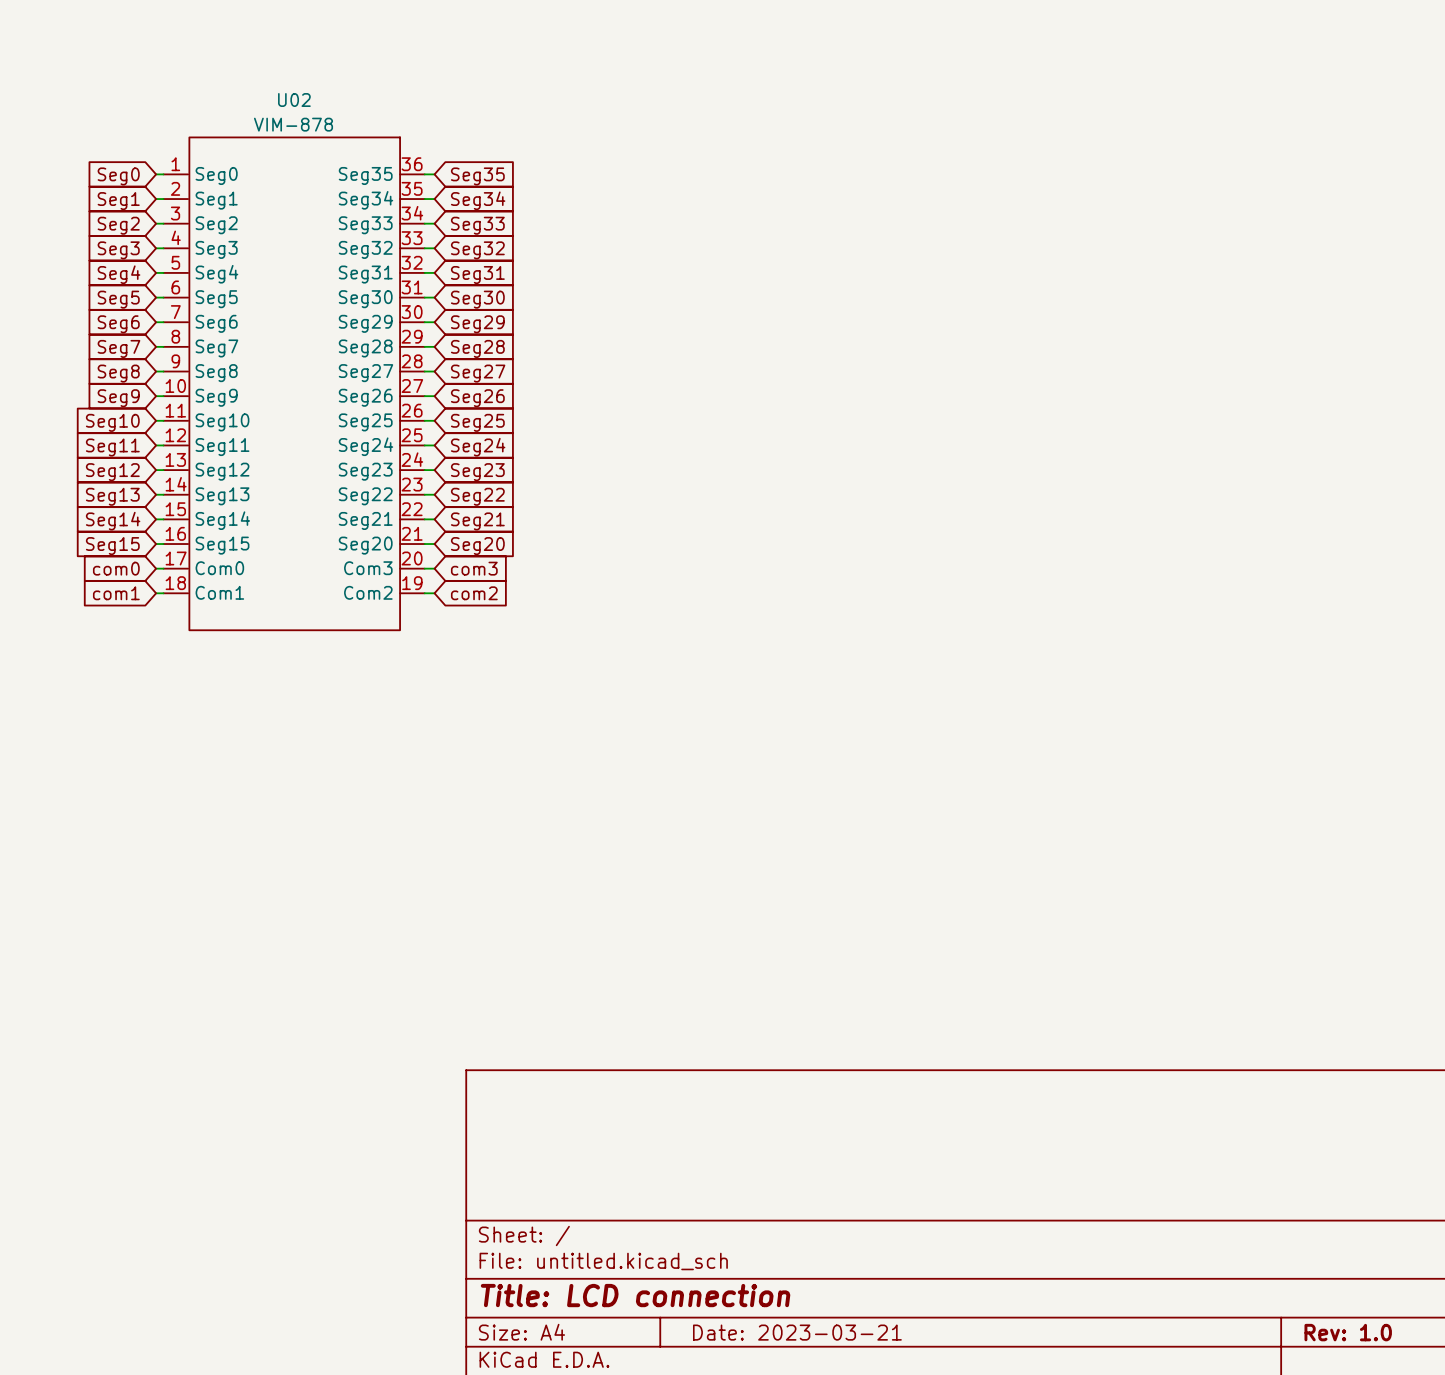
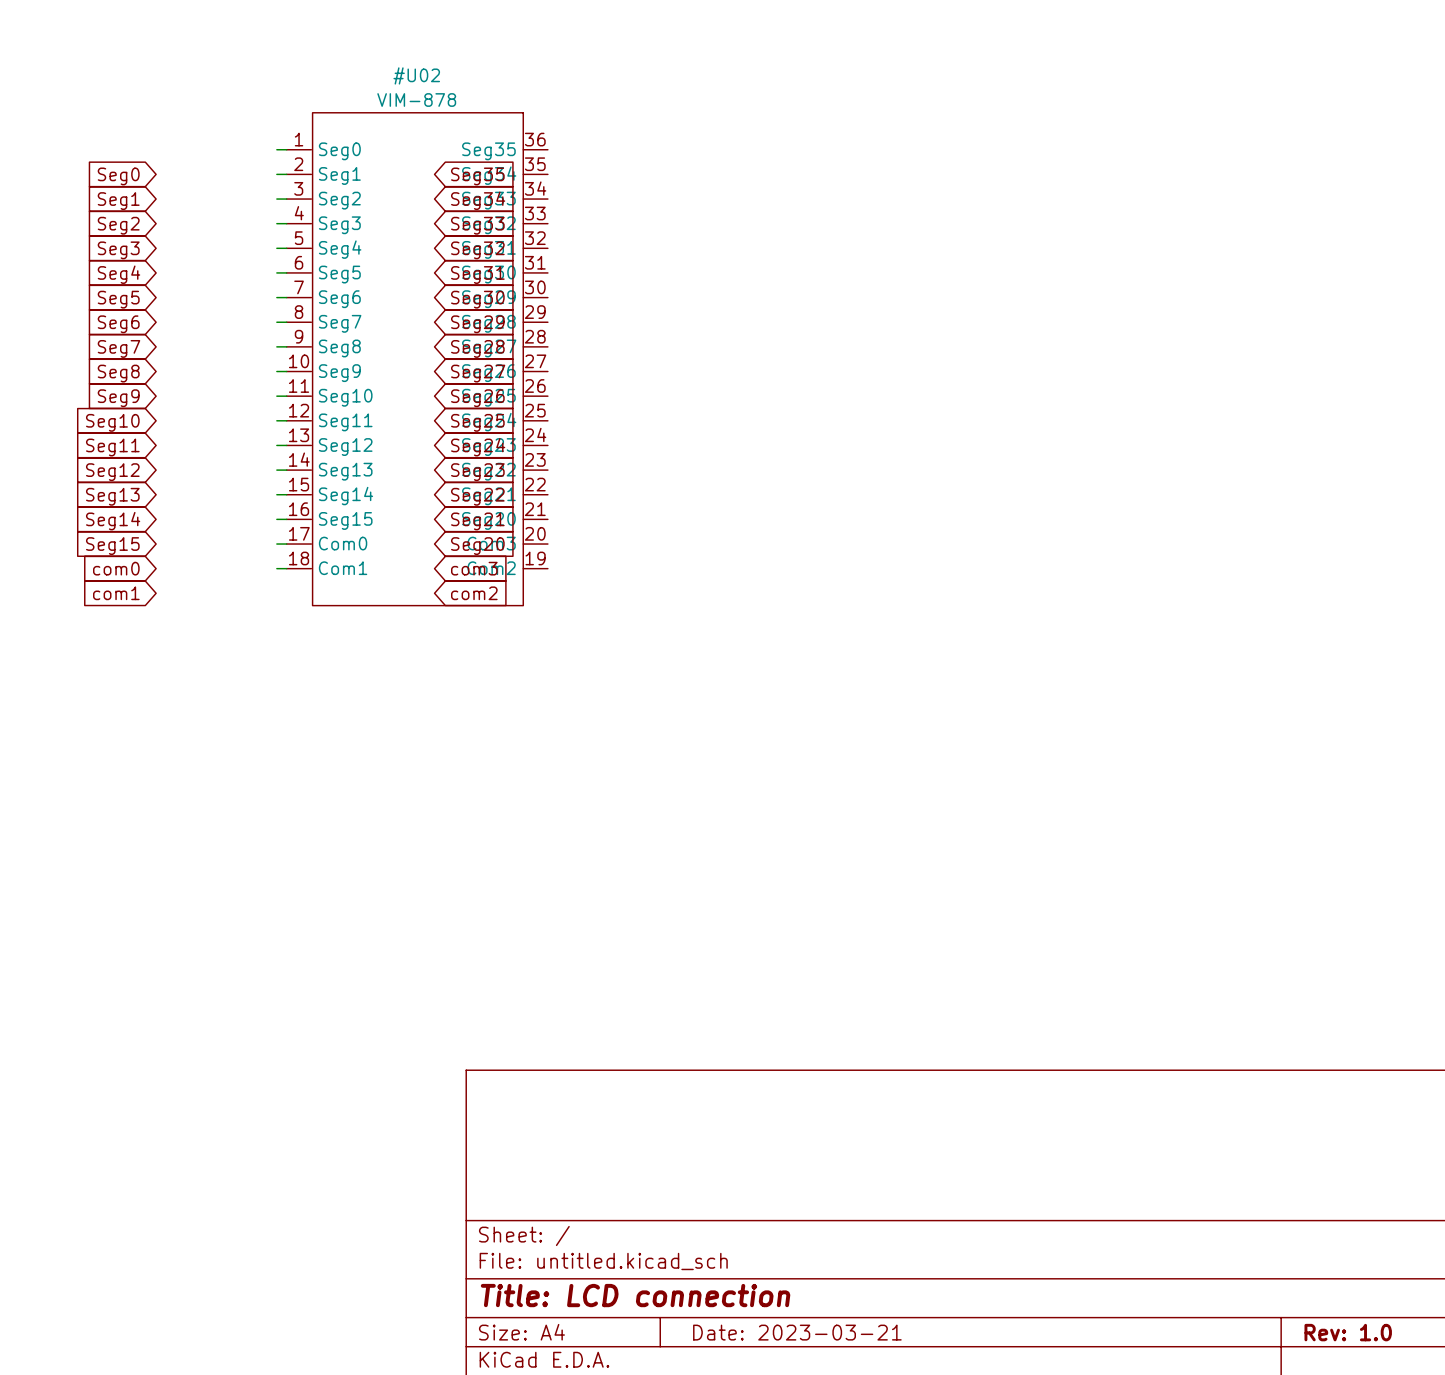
drawing: none -> [286, 112, 548, 606]
wire: (156, 174) (163, 174) -> none
wire: (424, 174) (434, 174) -> (276, 149) (286, 149)
wire: (156, 199) (163, 199) -> none
wire: (424, 199) (434, 199) -> (276, 174) (286, 174)
wire: (156, 223) (163, 223) -> none
wire: (424, 223) (434, 223) -> (276, 199) (286, 199)
wire: (156, 248) (163, 248) -> none
wire: (424, 248) (434, 248) -> (276, 223) (286, 223)
wire: (156, 272) (163, 272) -> none
wire: (424, 272) (434, 272) -> (276, 248) (286, 248)
wire: (156, 297) (163, 297) -> none
wire: (424, 297) (434, 297) -> (276, 272) (286, 272)
wire: (156, 322) (163, 322) -> none
wire: (424, 322) (434, 322) -> (276, 297) (286, 297)
wire: (156, 346) (163, 346) -> none
wire: (424, 346) (434, 346) -> (276, 322) (286, 322)
wire: (156, 371) (163, 371) -> none
wire: (424, 371) (434, 371) -> (276, 346) (286, 346)
U02: VIM-878 (294, 383) -> none
wire: (156, 396) (163, 396) -> none
wire: (424, 396) (434, 396) -> (276, 371) (286, 371)
wire: (156, 420) (163, 420) -> none
wire: (424, 420) (434, 420) -> (276, 396) (286, 396)
wire: (156, 445) (163, 445) -> none
wire: (424, 445) (434, 445) -> (276, 420) (286, 420)
wire: (156, 470) (163, 470) -> none
wire: (424, 470) (434, 470) -> (276, 445) (286, 445)
wire: (156, 494) (163, 494) -> none
wire: (424, 494) (434, 494) -> (276, 470) (286, 470)
wire: (156, 519) (163, 519) -> none
wire: (424, 519) (434, 519) -> (276, 494) (286, 494)
wire: (156, 544) (163, 544) -> none
wire: (424, 544) (434, 544) -> (276, 519) (286, 519)
wire: (156, 568) (163, 568) -> none
wire: (424, 568) (434, 568) -> (276, 544) (286, 544)
wire: (156, 593) (163, 593) -> none
wire: (424, 593) (434, 593) -> (276, 568) (286, 568)

